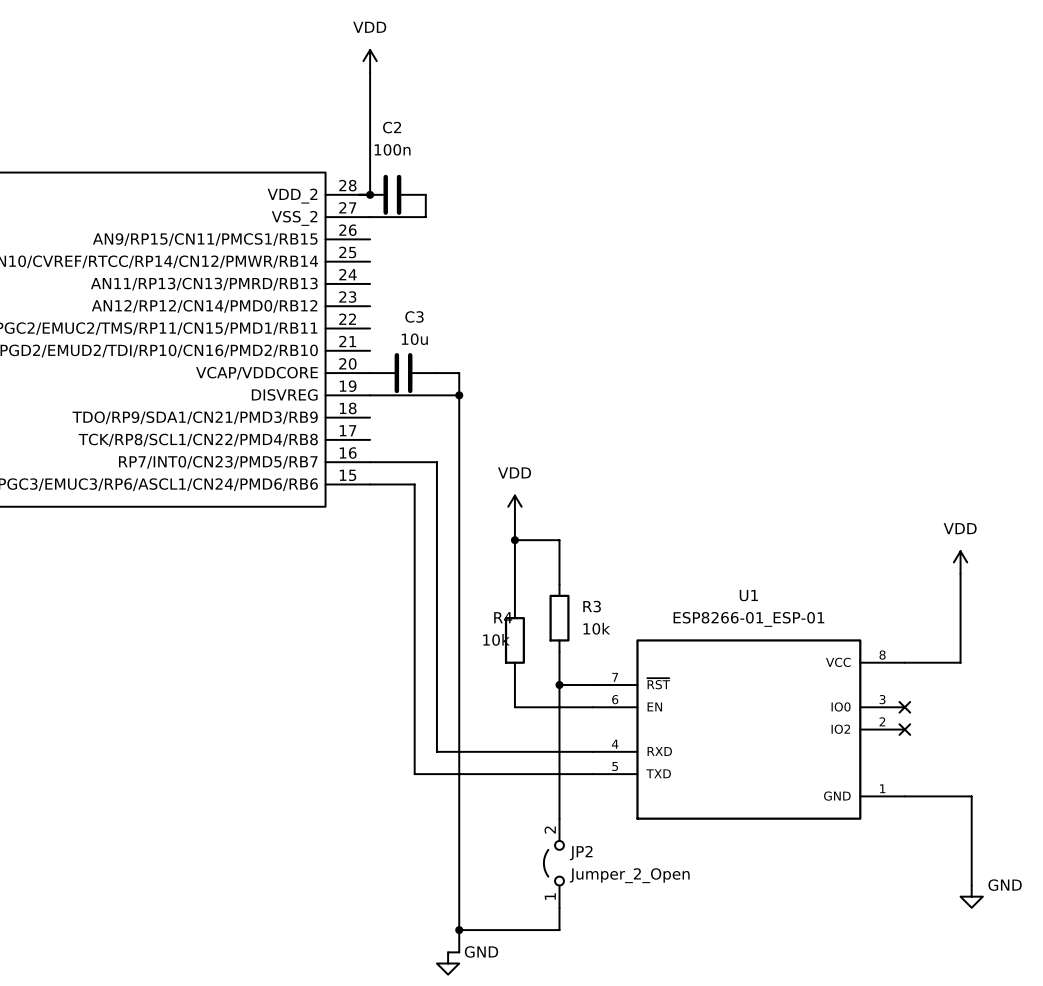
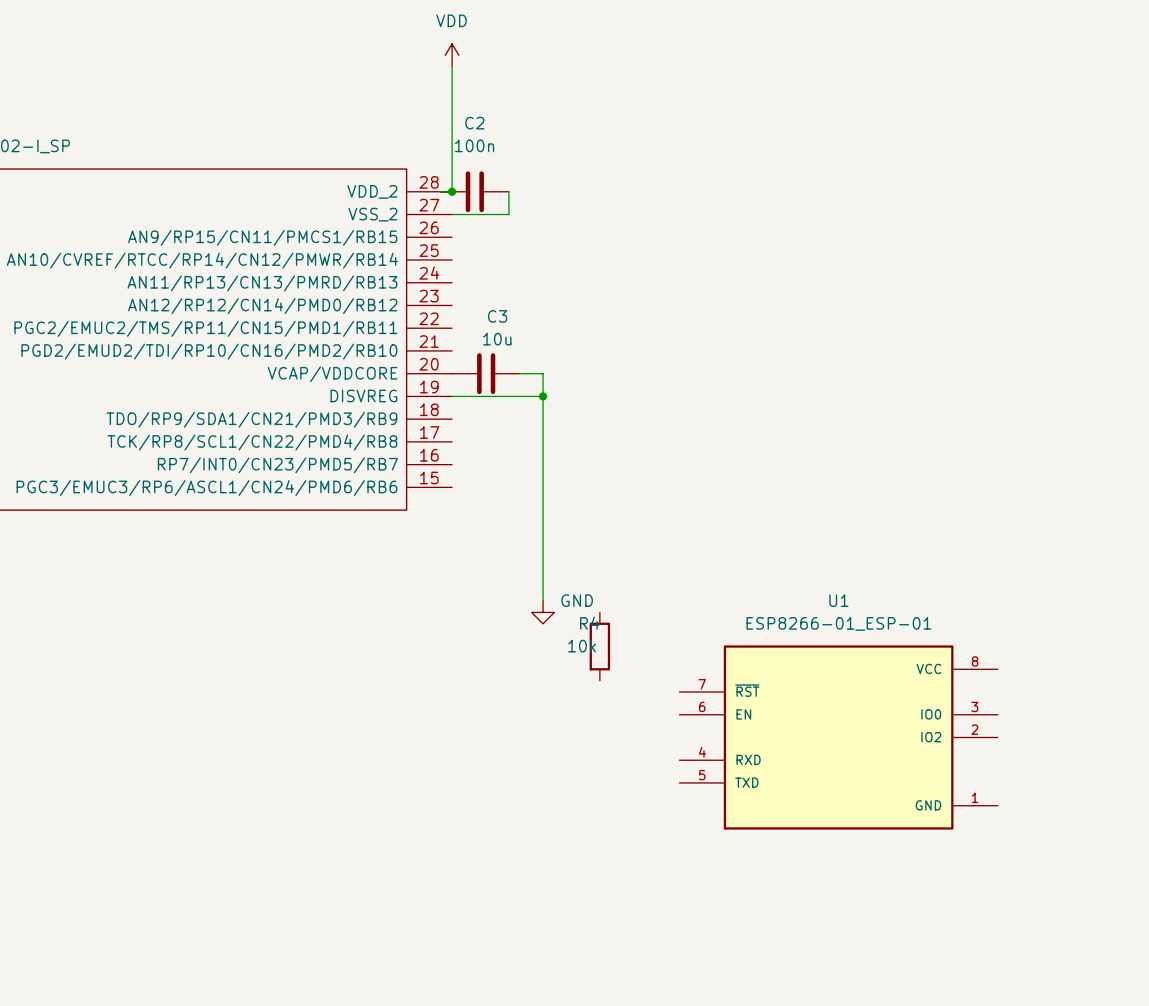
wire: (370, 462) (436, 462) (436, 751) (592, 751) -> none
wire: (370, 484) (414, 484) (414, 774) (592, 774) -> none
power symbol: VDD (514, 506) -> none
wire: (514, 517) (514, 607) -> none
wire: (514, 540) (559, 540) (559, 584) -> none
junction: (514, 540) -> none
power symbol: VDD (960, 562) -> none
wire: (960, 573) (960, 662) (904, 662) -> none
wire: (459, 595) (459, 952) (448, 952) -> none
power symbol: none -> GND (543, 612)
R3: 10k (559, 618) -> none
wire: (559, 651) (559, 818) -> none
wire: (514, 673) (514, 707) (592, 707) -> none
wire: (559, 685) (592, 685) -> none
junction: (559, 685) -> none
no-connect mark: (904, 707) -> none
no-connect mark: (904, 729) -> none
wire: (904, 796) (971, 796) (971, 885) -> none
JP2: Jumper_2_Open (553, 863) -> none
power symbol: GND (971, 896) -> none
wire: (559, 907) (559, 930) (459, 930) -> none
junction: (459, 930) -> none
power symbol: GND (448, 963) -> none

